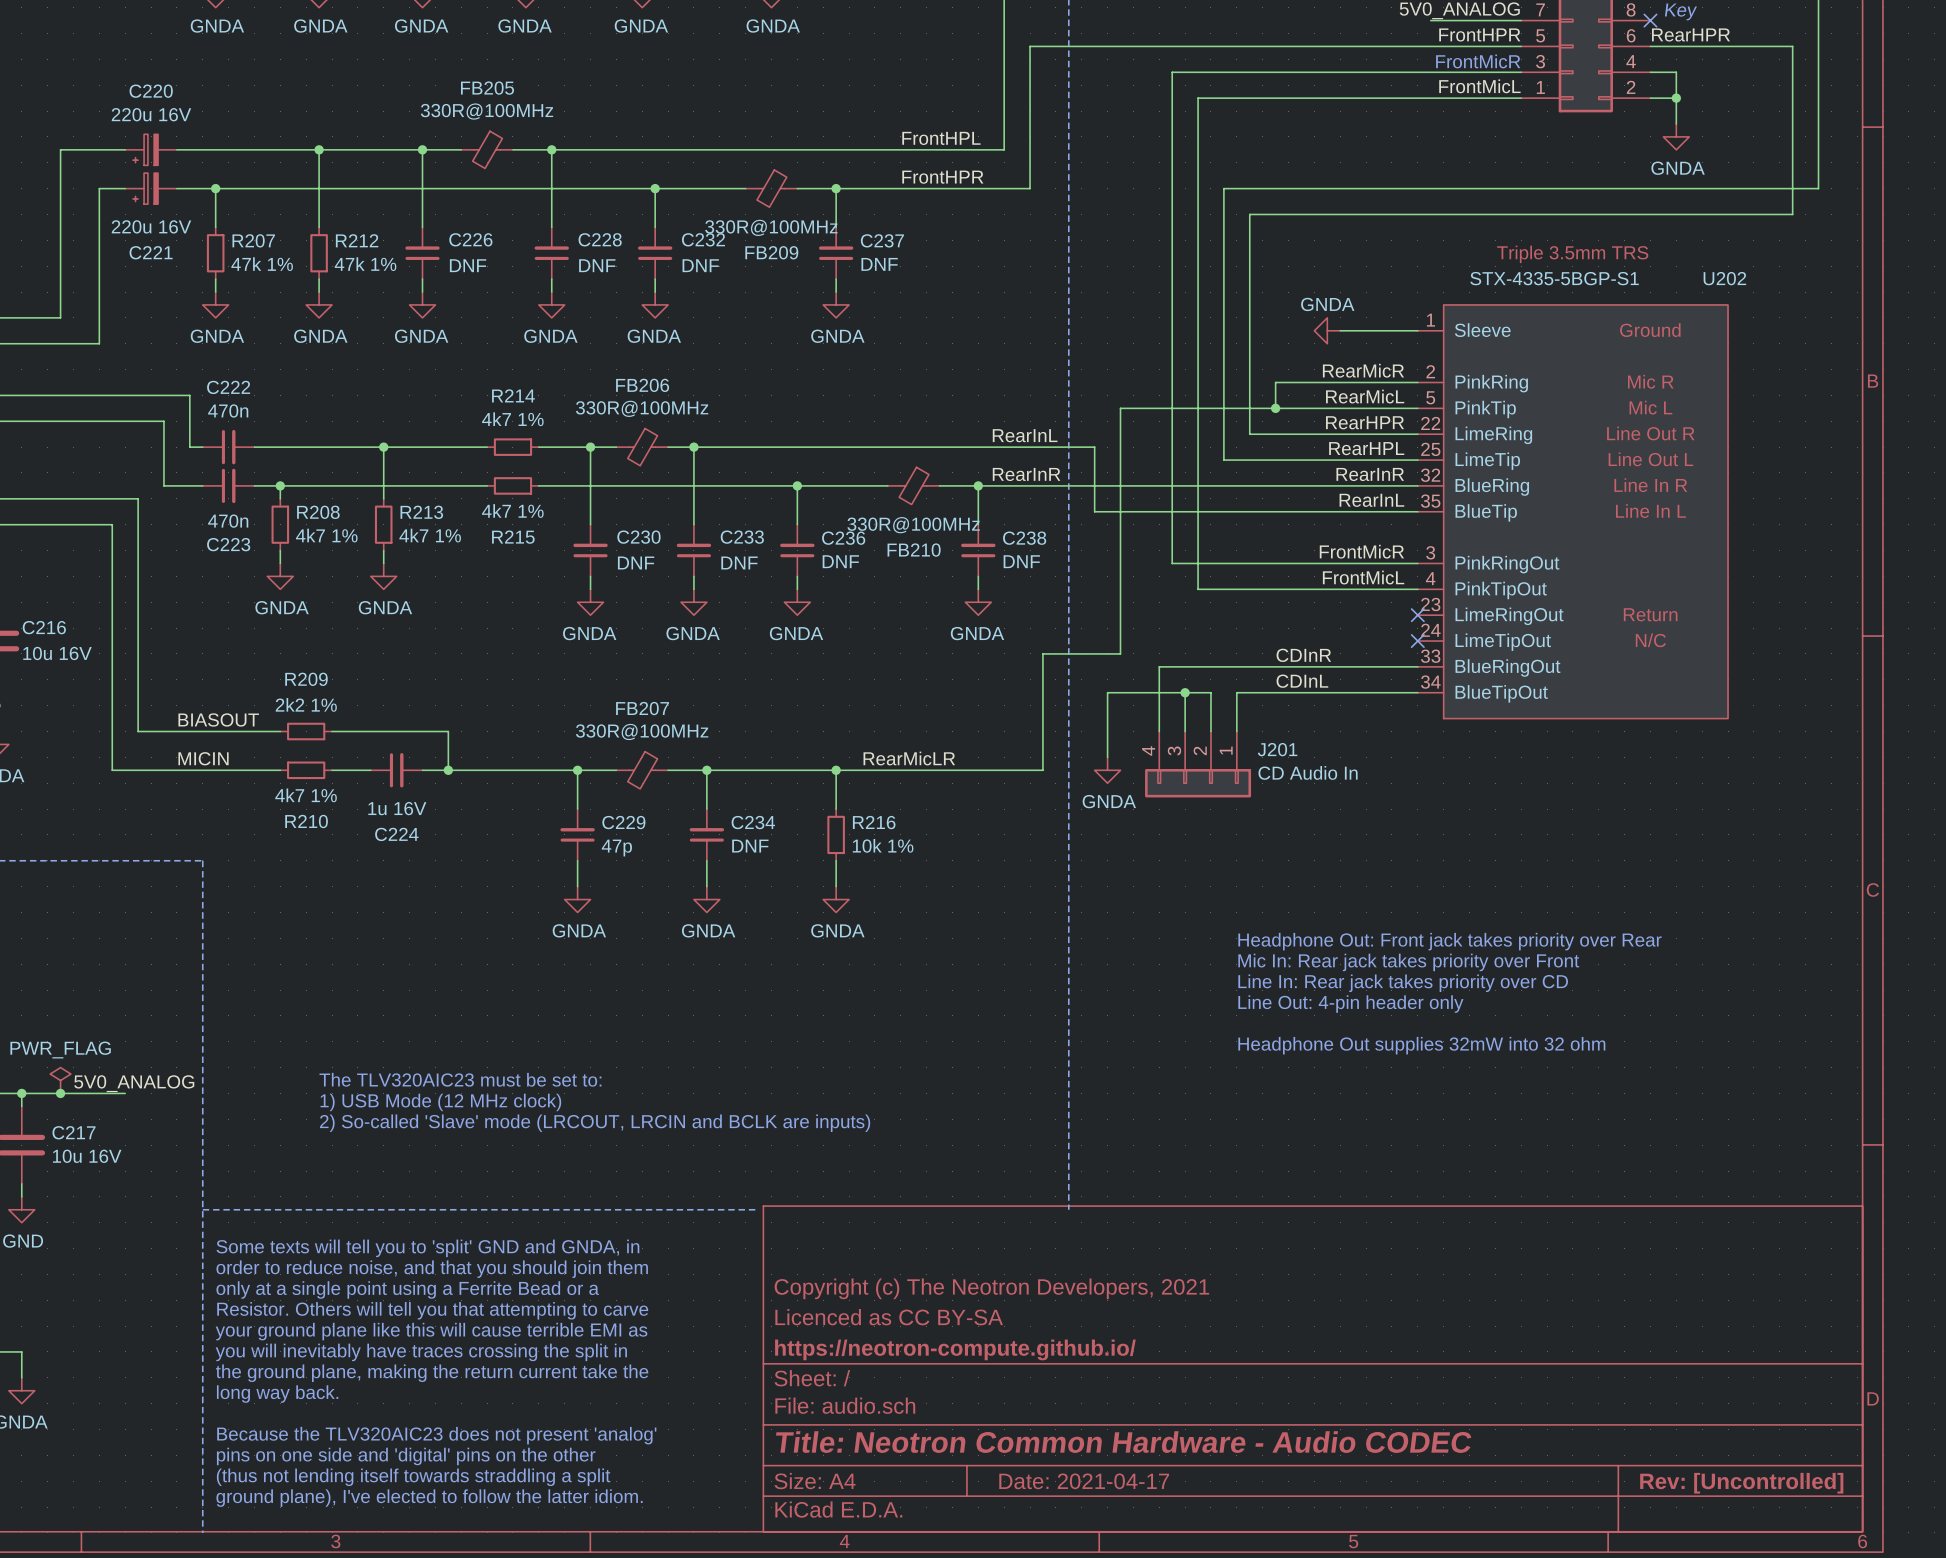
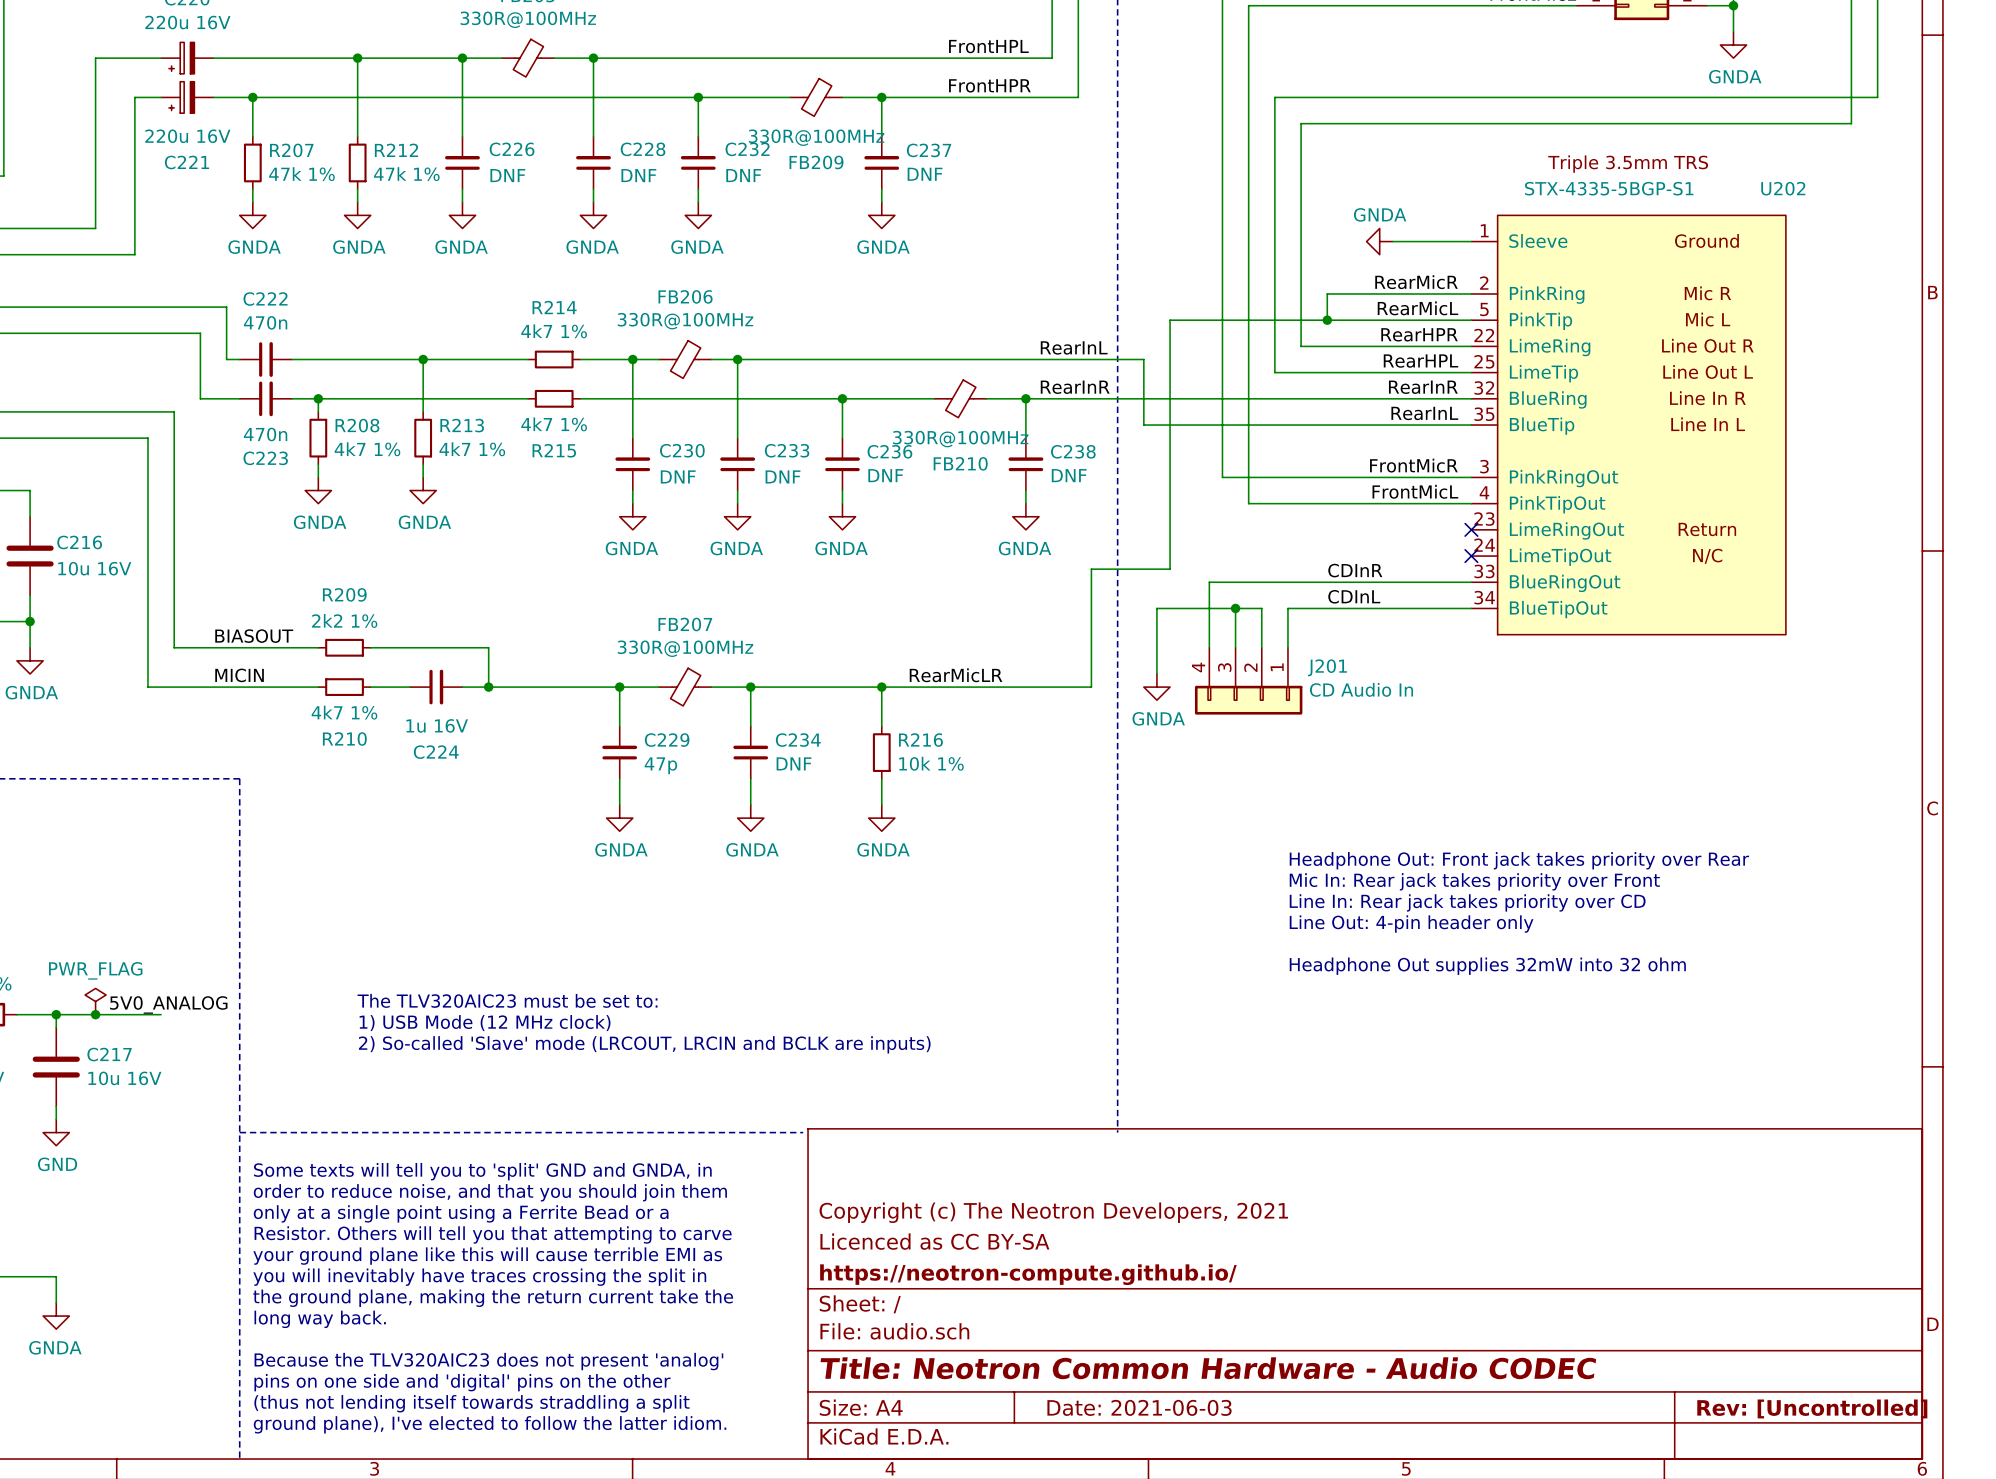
title block: Date: 2021-04-17 (1084, 1481) -> Date: 2021-06-03 (1139, 1407)

